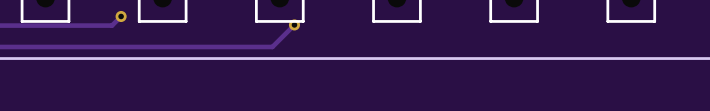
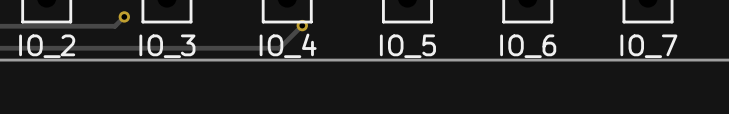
part value: none -> IO_2 (47, 46)
part value: none -> IO_3 (167, 46)
part value: none -> IO_4 (288, 45)
part value: none -> IO_5 (407, 46)
part value: none -> IO_6 (528, 46)
part value: none -> IO_7 (648, 46)

